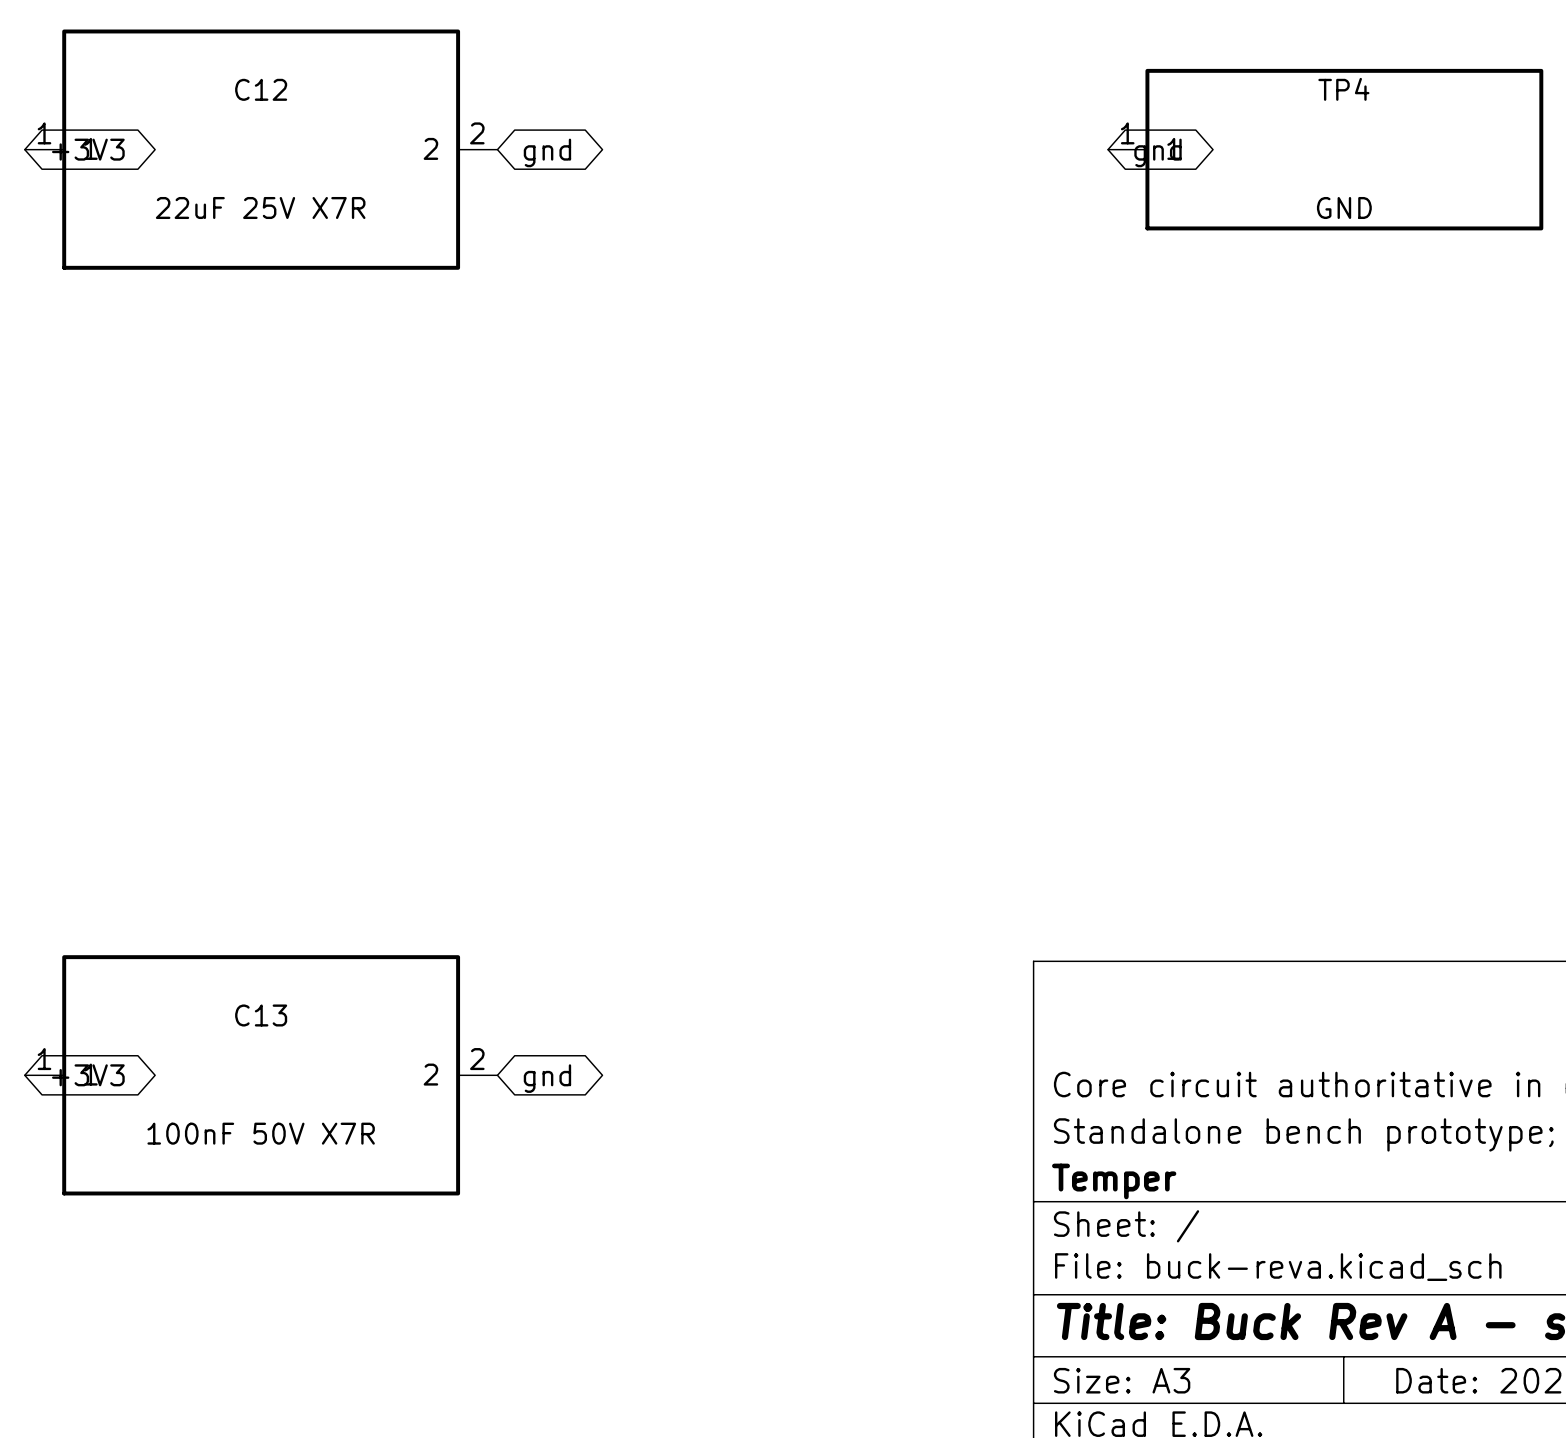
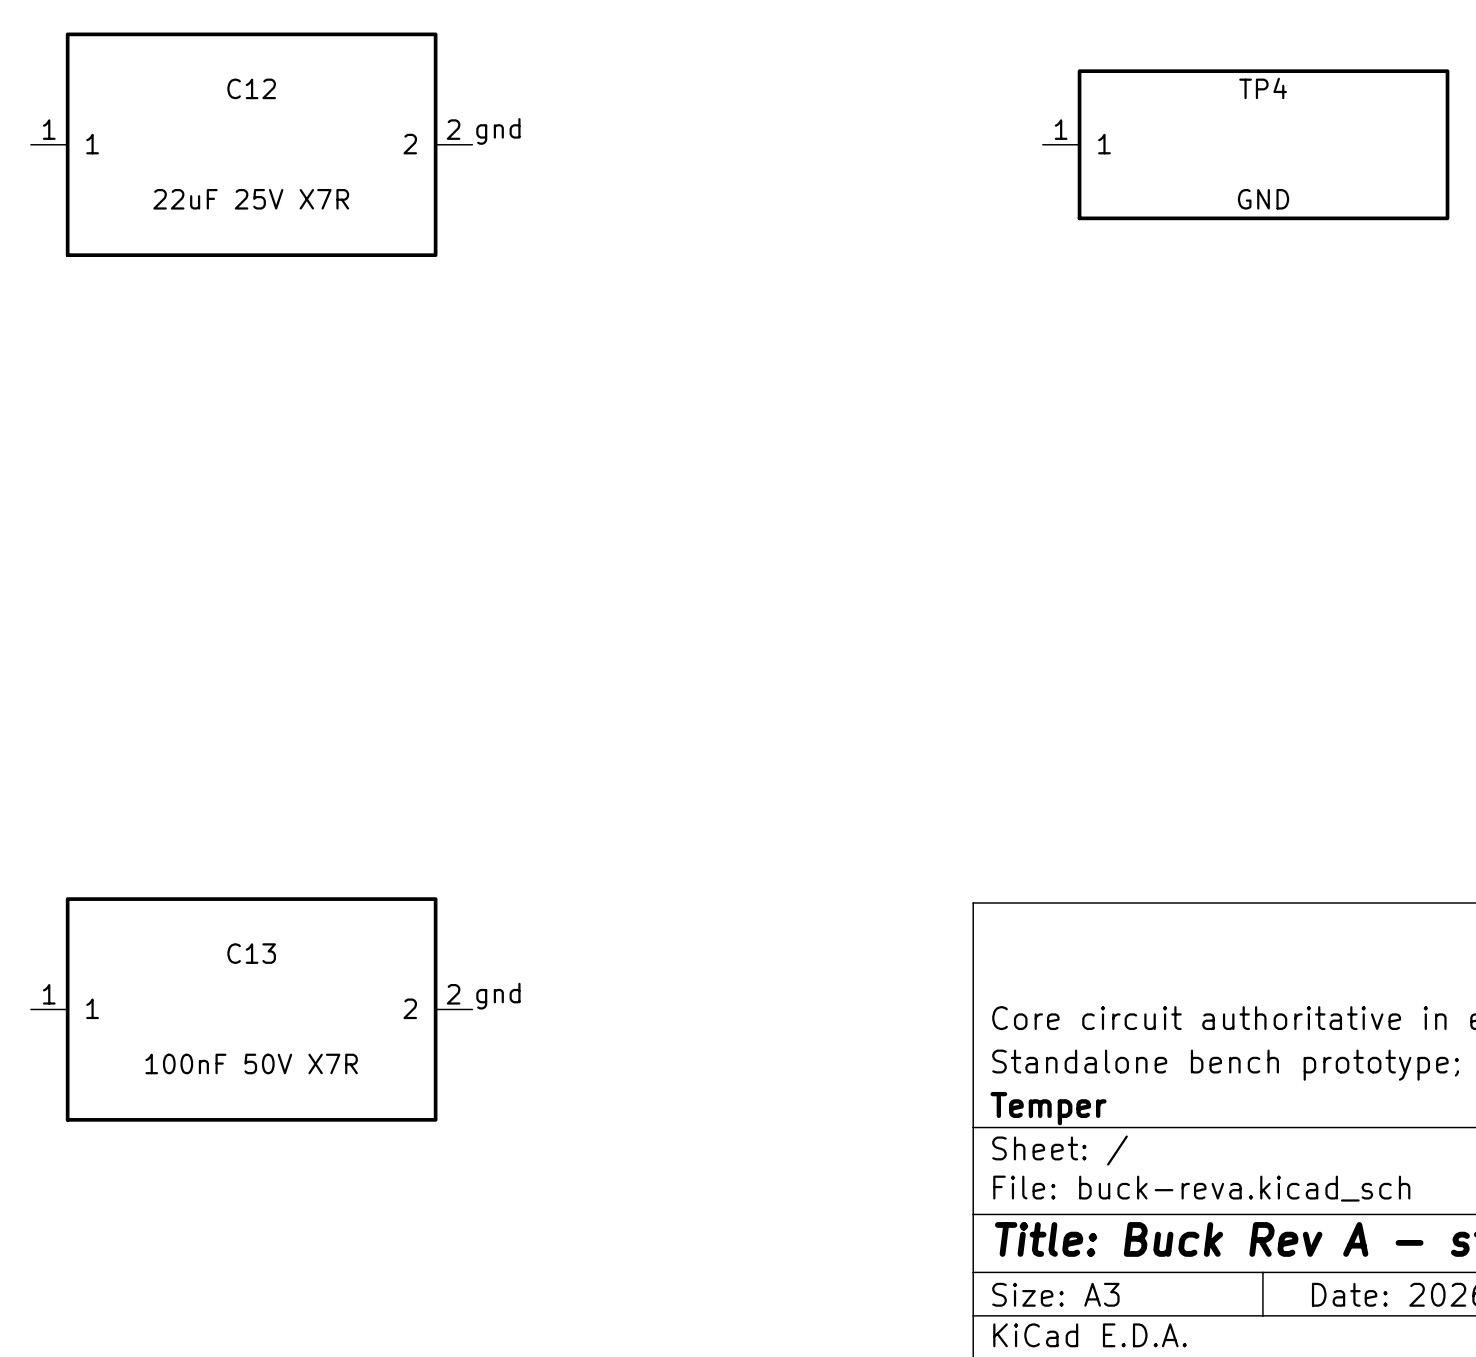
label: none -> gnd (498, 131)
global label: +3V3 (88, 149) -> none
global label: gnd (547, 152) -> none
global label: gnd (1158, 152) -> none
label: none -> gnd (498, 996)
global label: +3V3 (88, 1075) -> none
global label: gnd (547, 1078) -> none

